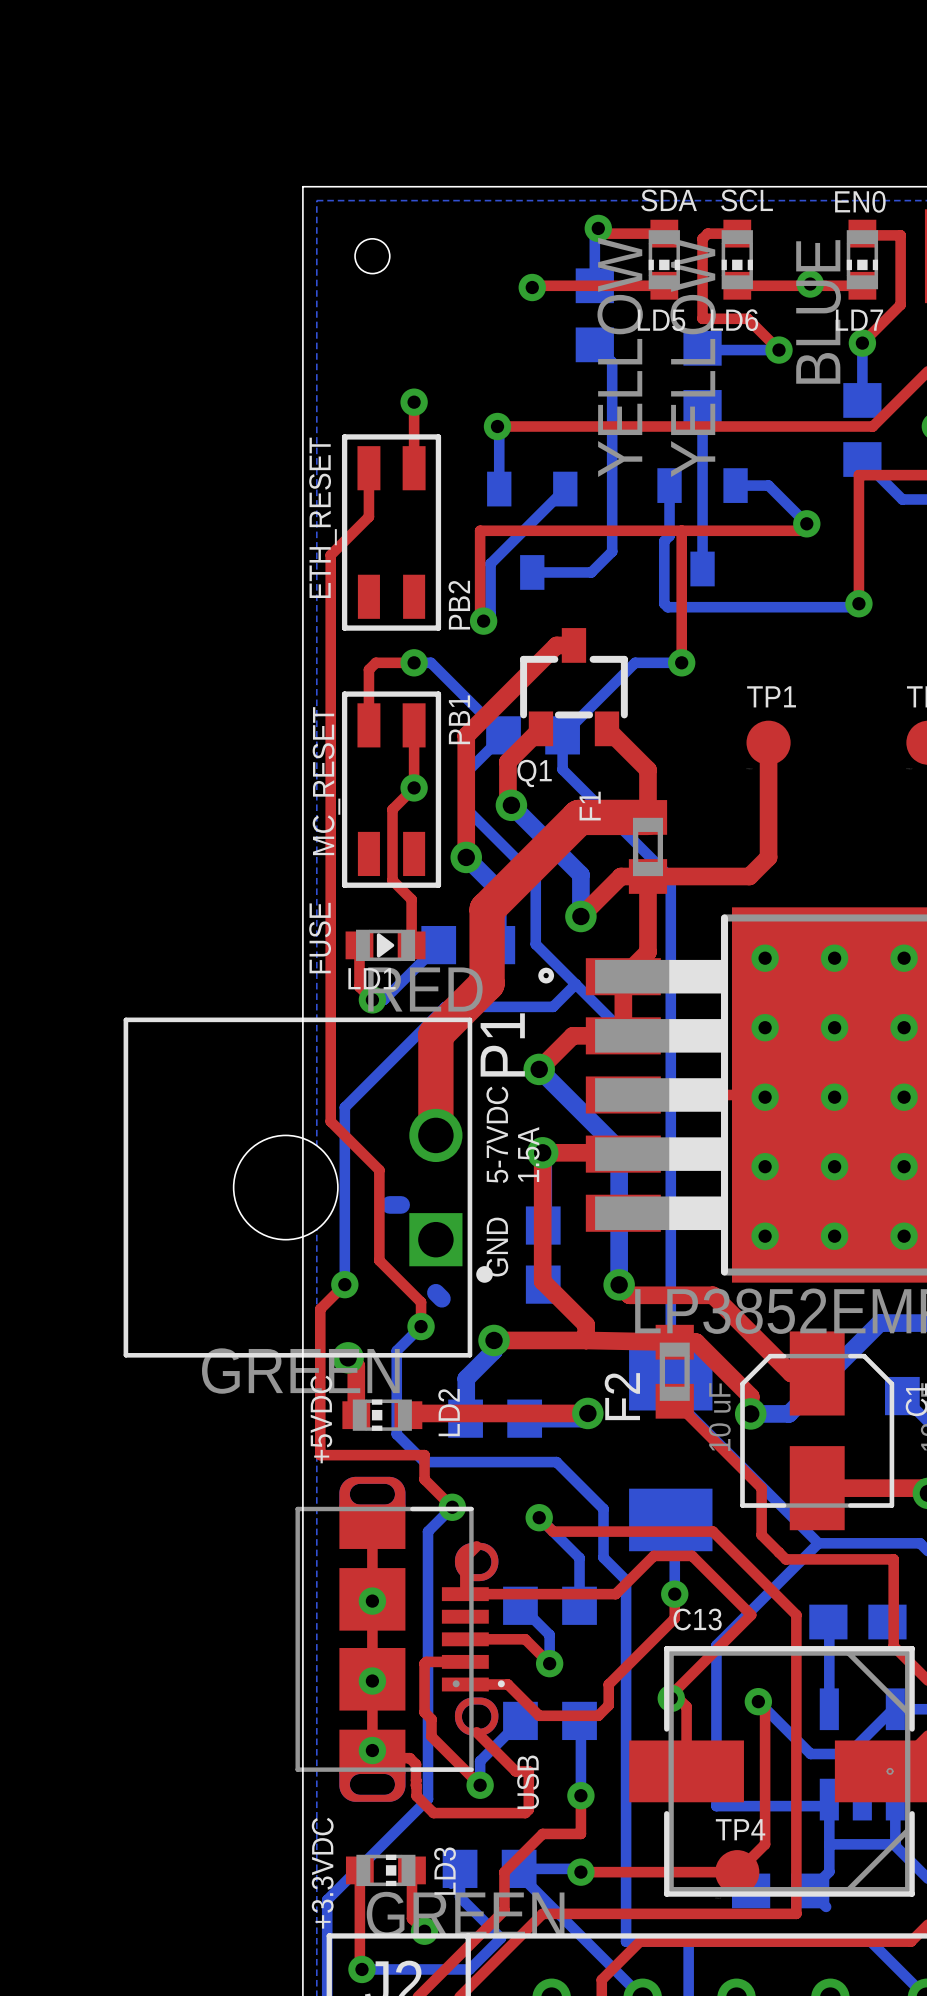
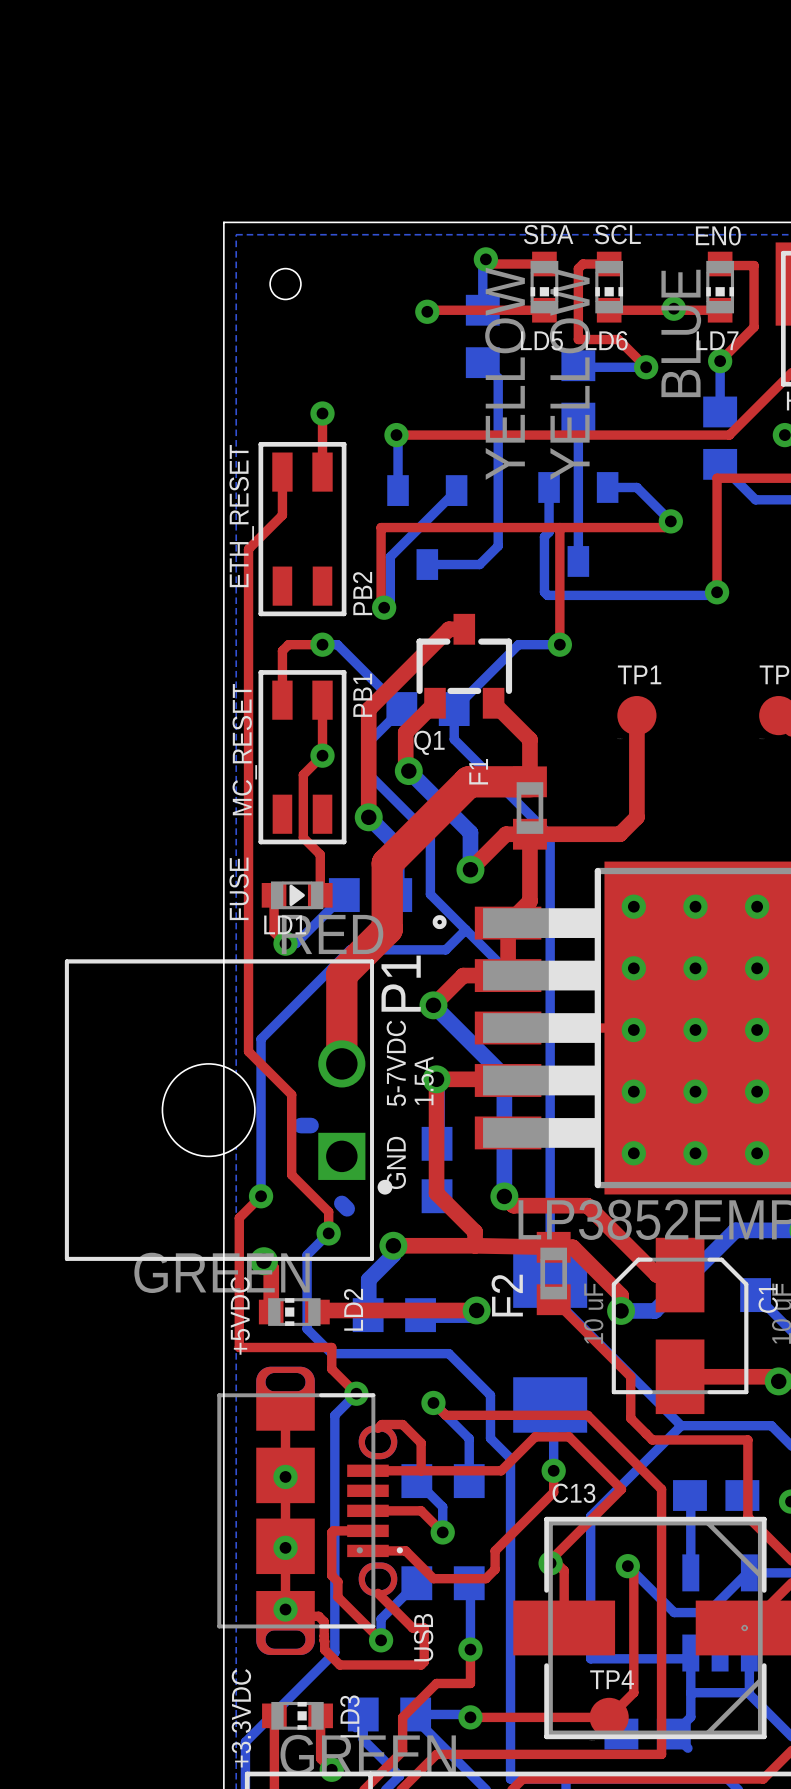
top track: (476, 1546) (465, 1557) (465, 1594) -> (377, 1428) (381, 1424) (402, 1424) (421, 1443) (421, 1470)

